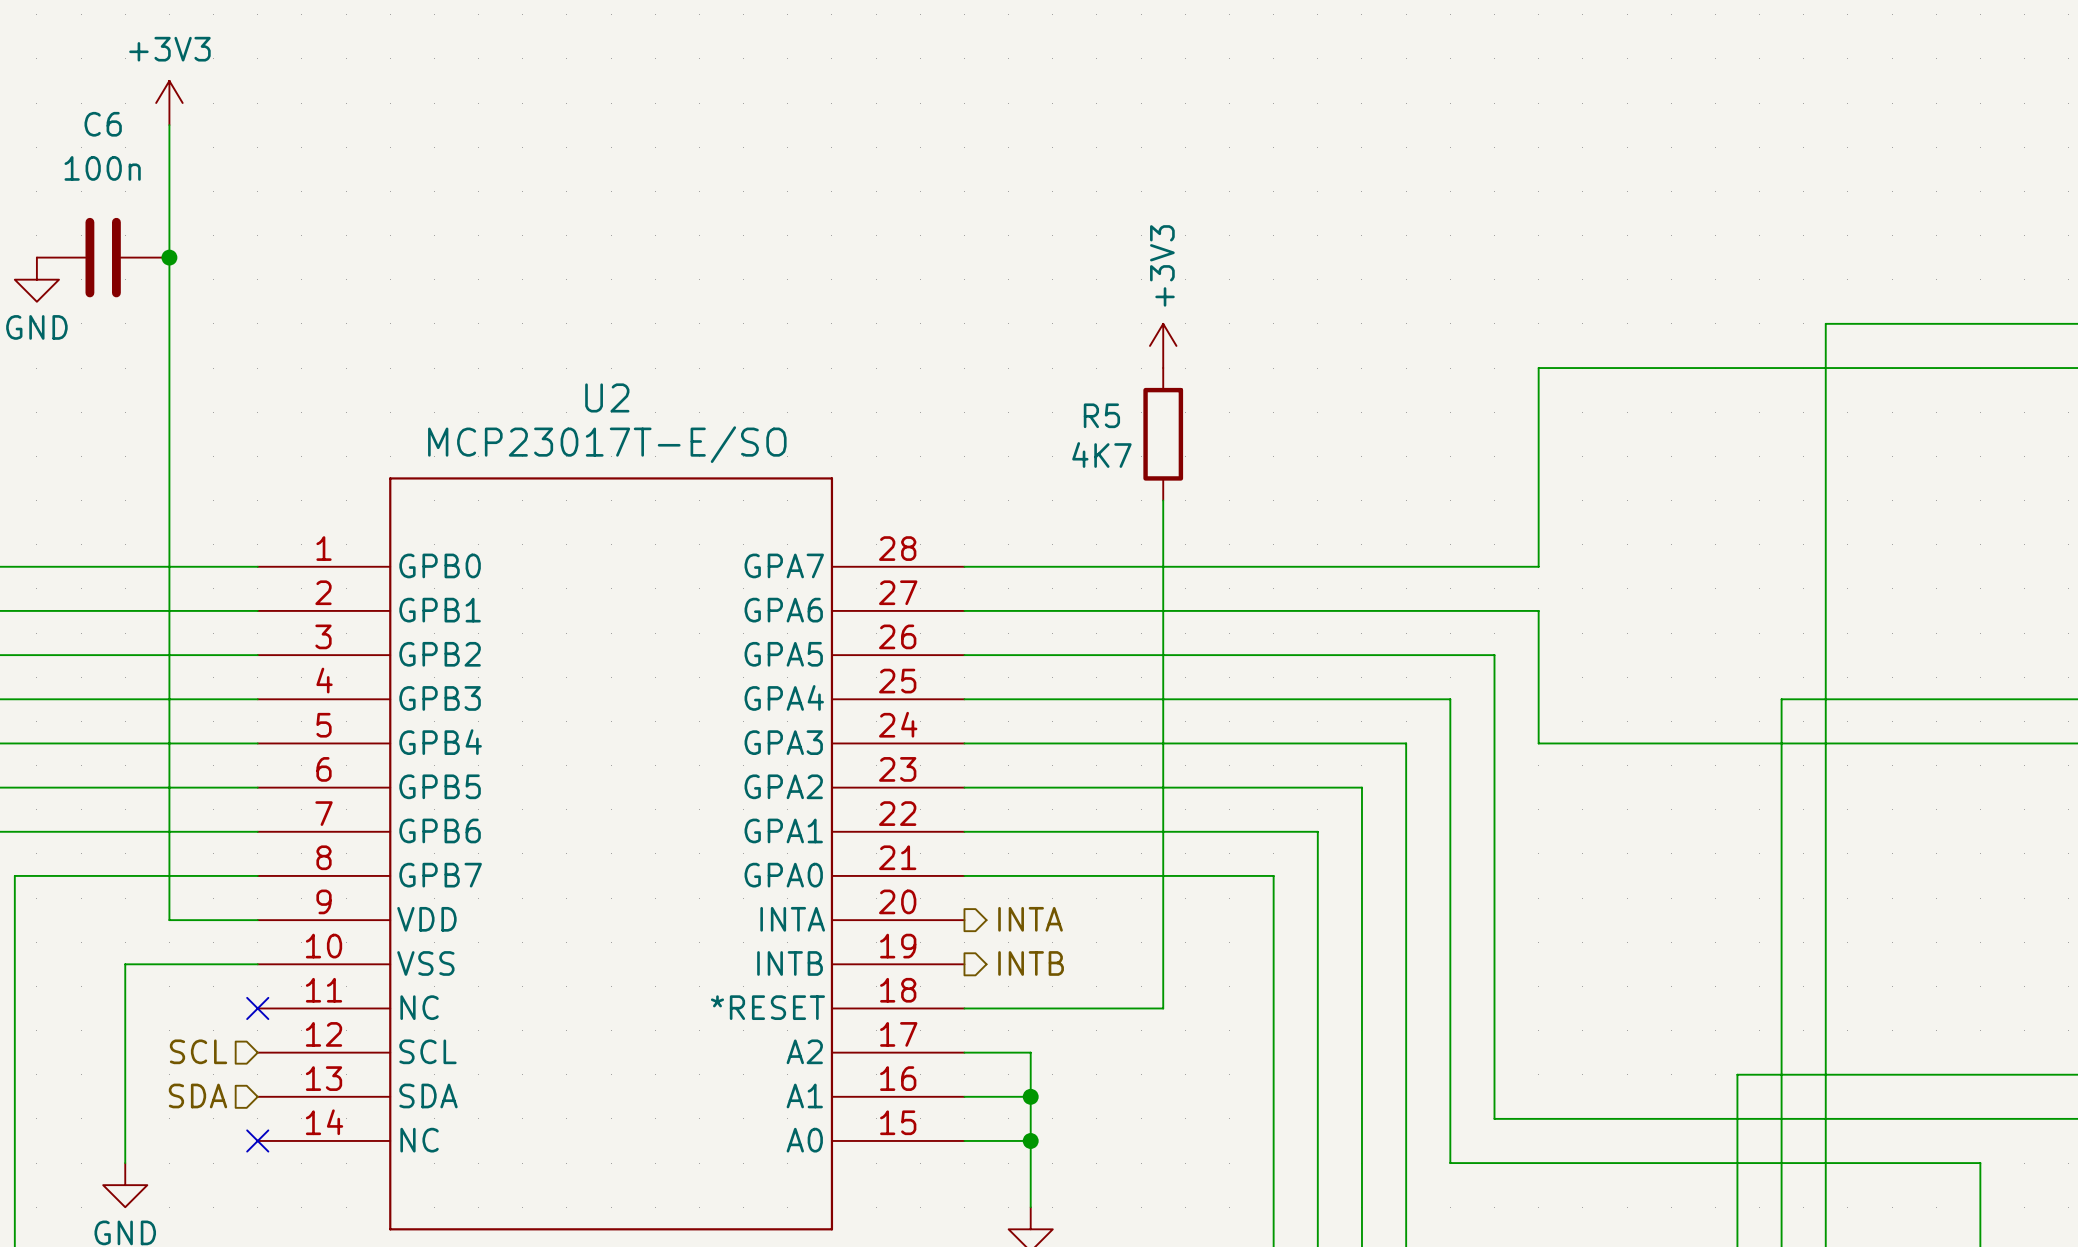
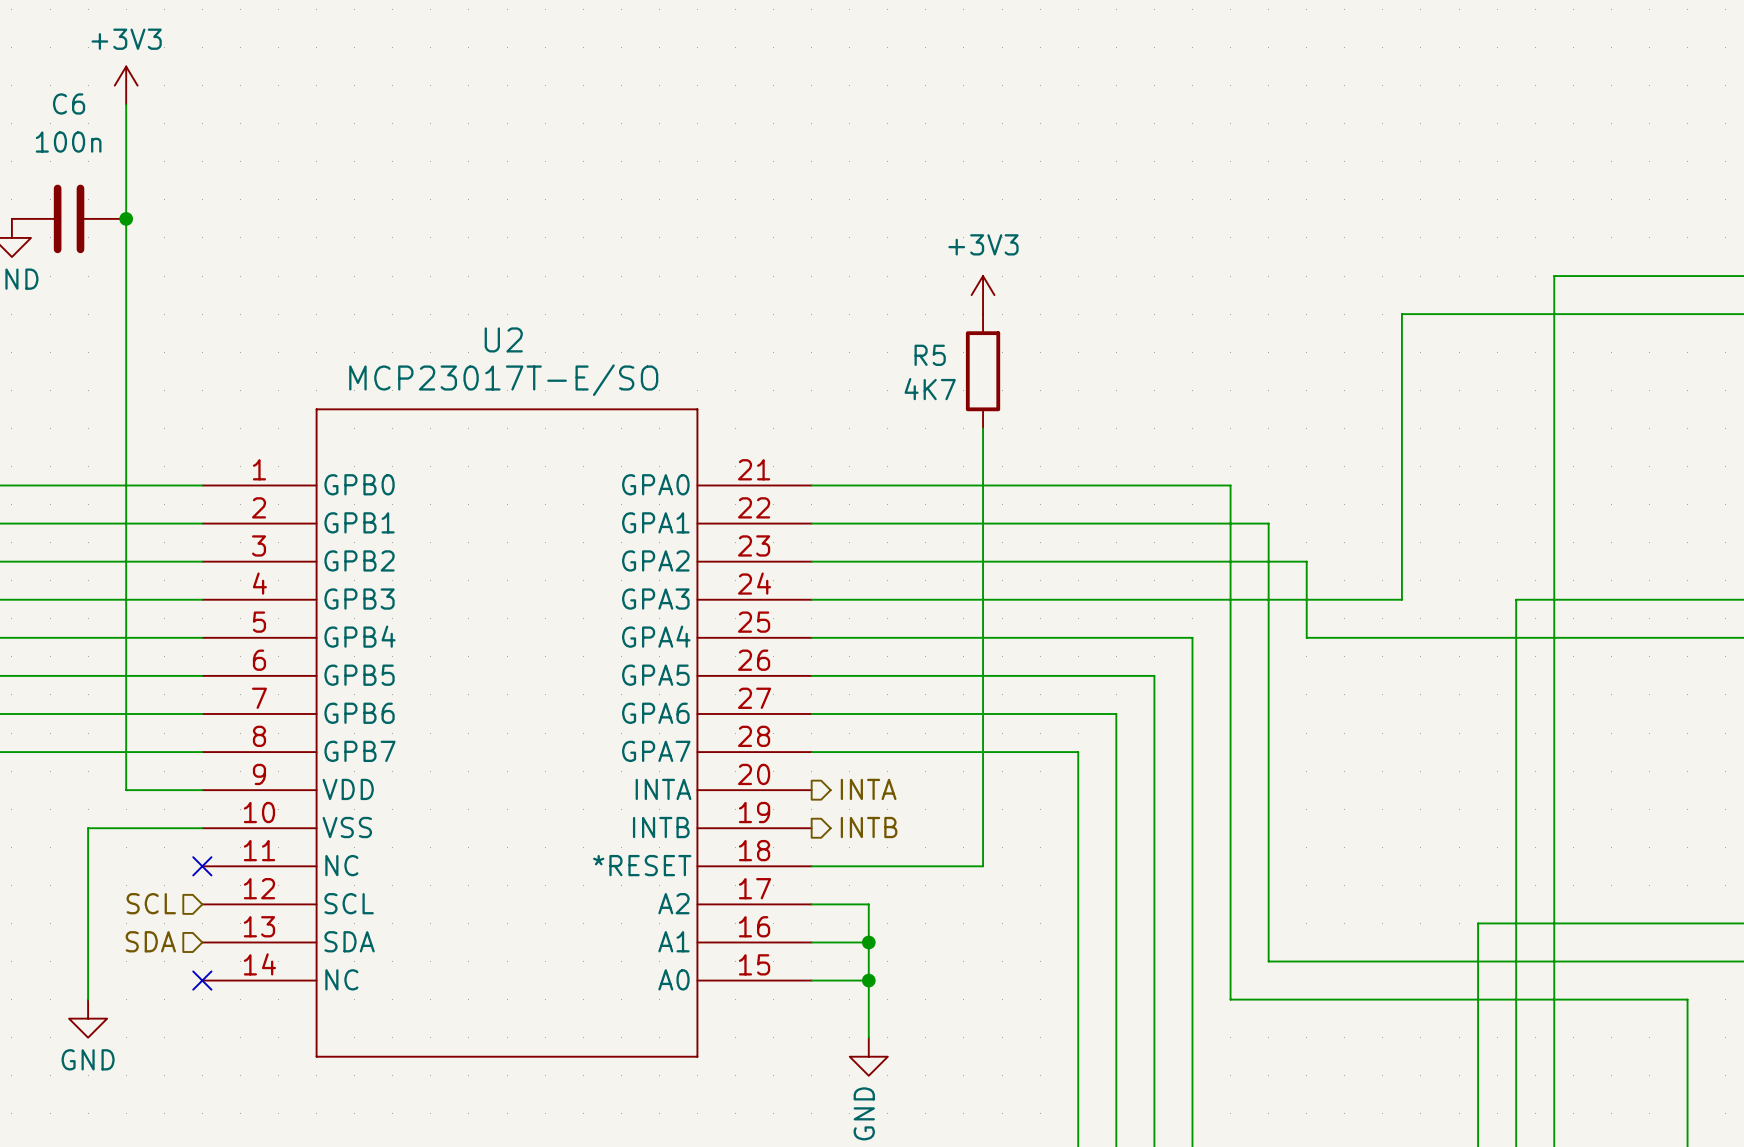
power symbol text rotation: 0° (1162, 265) -> 90° clockwise (983, 244)
wire: (1649, 368) (1538, 368) (1538, 566) (1450, 566) -> (1401, 314) (1401, 599) (1230, 599) (1230, 485)
U2 symbol: [257, 477, 965, 1231] -> [202, 408, 812, 1058]
wire: (1494, 610) (1538, 610) (1538, 655) -> (1268, 523) (1268, 561) (1306, 561)

